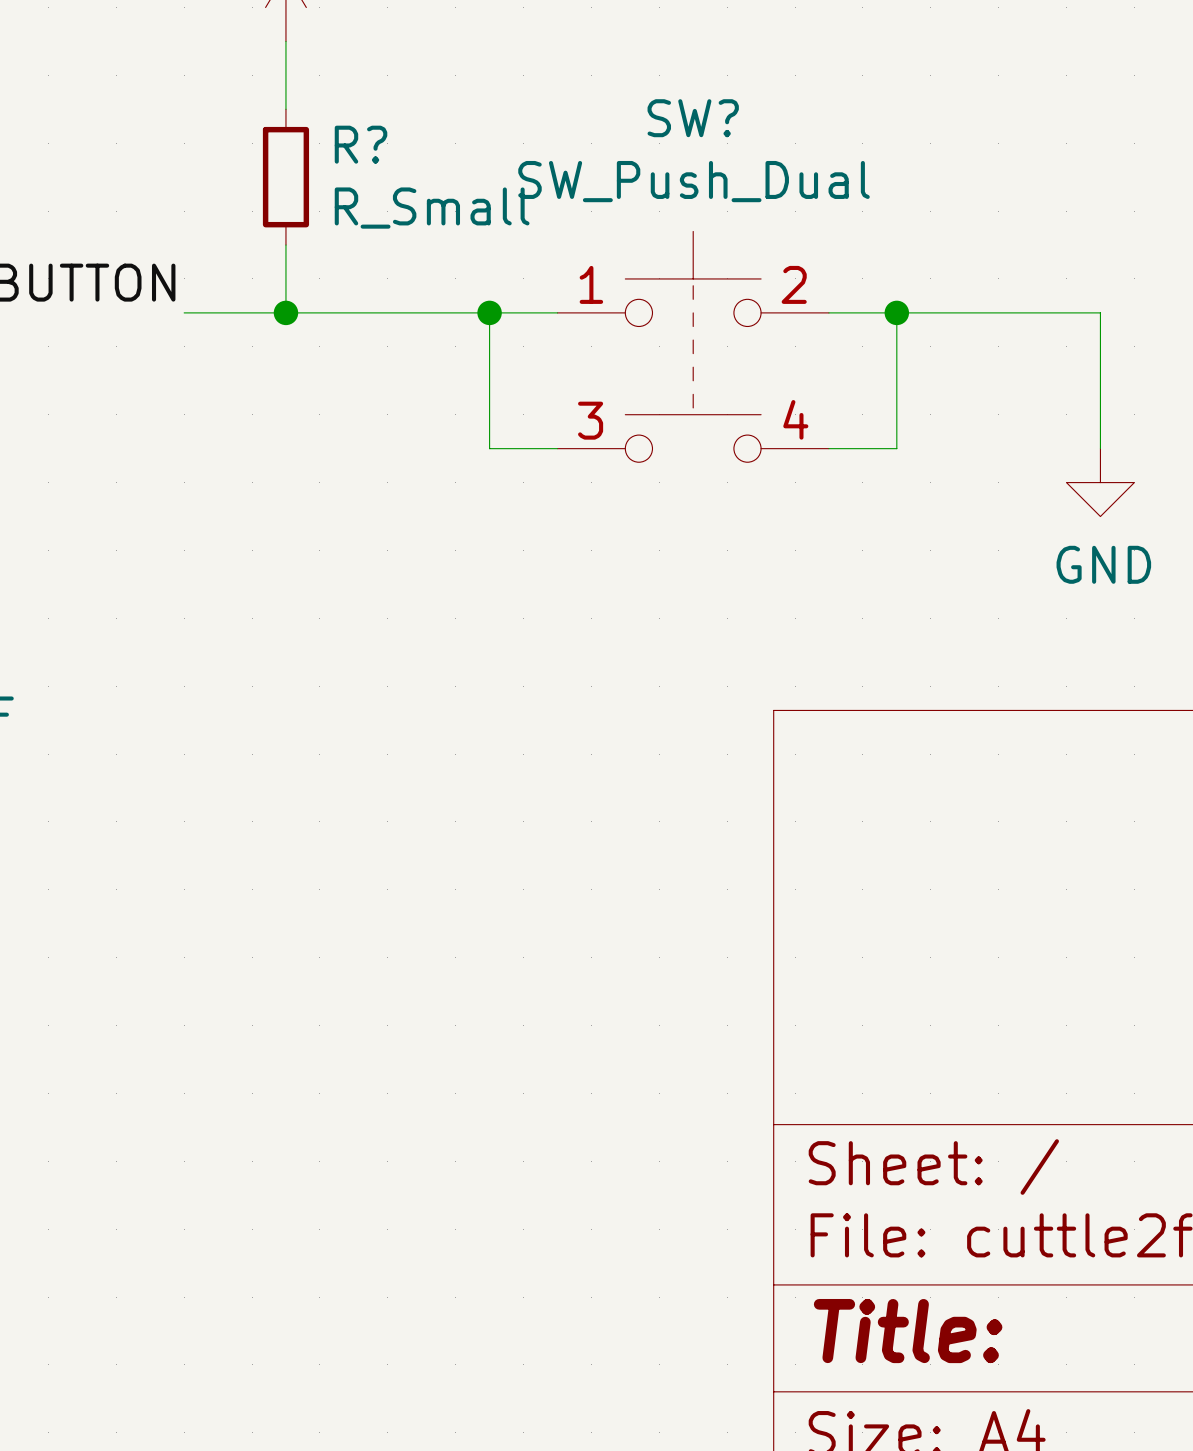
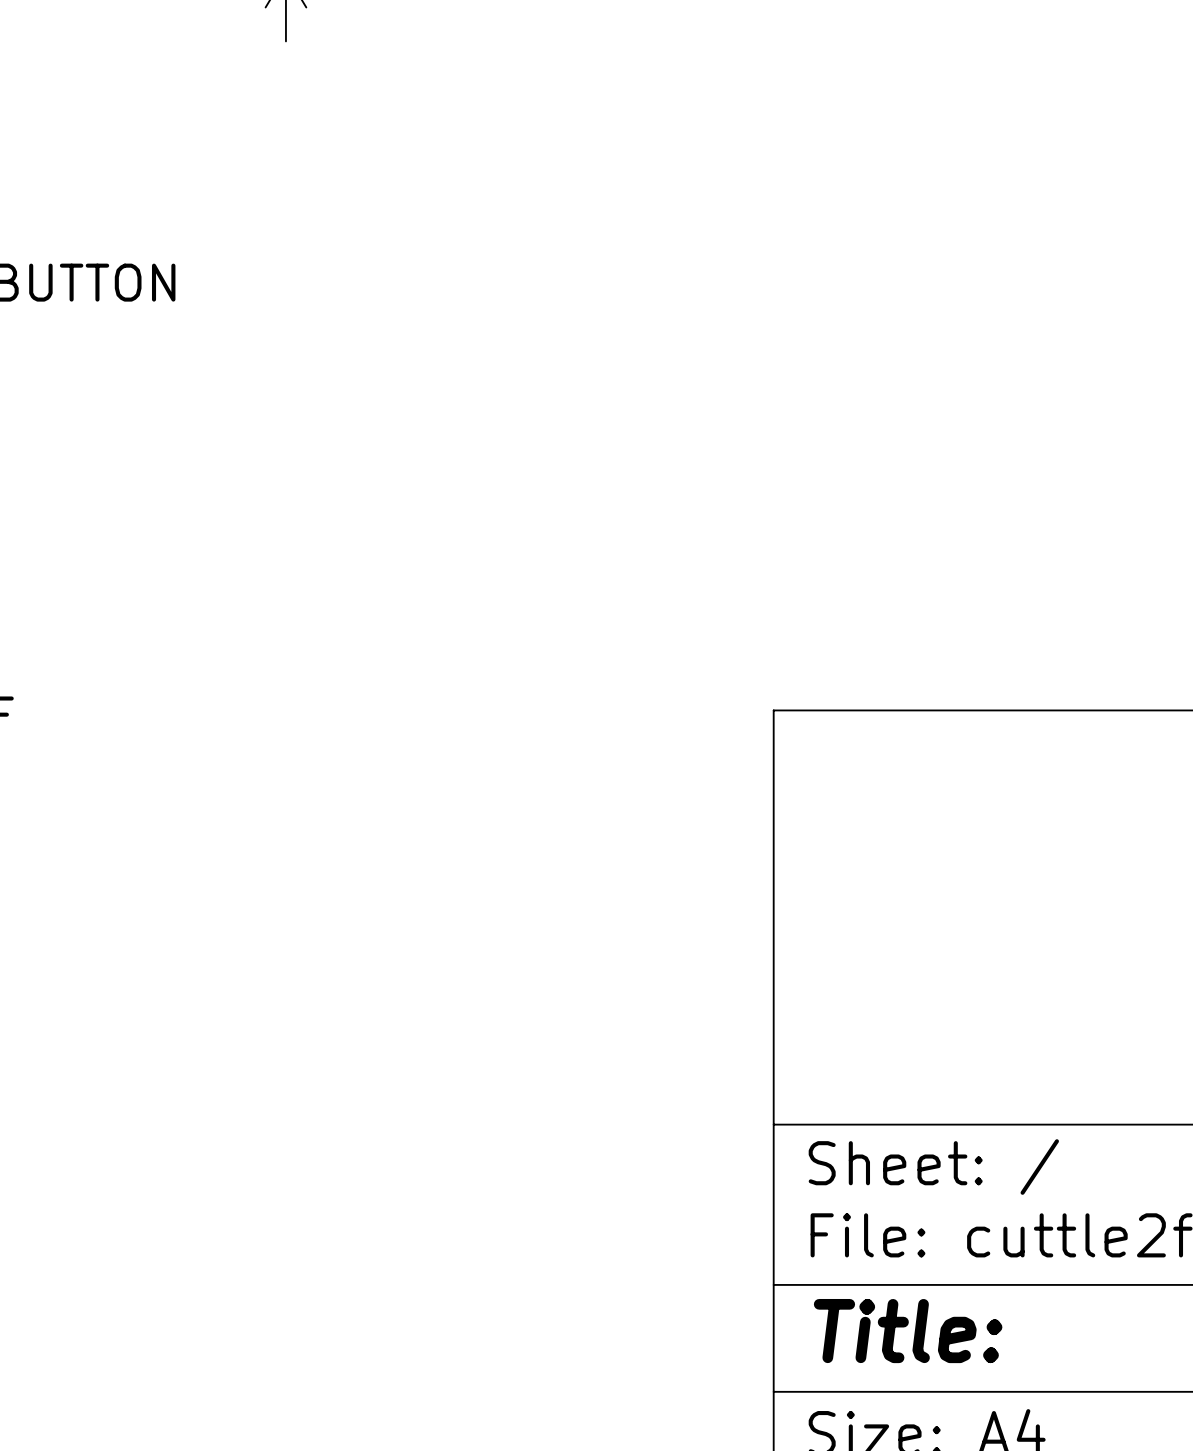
wire: (285, 41) (285, 109) -> none
R?: R_Small (285, 177) -> none
wire: (285, 245) (285, 312) -> none
wire: (184, 312) (557, 312) -> none
junction: (285, 312) -> none
wire: (489, 312) (489, 448) (557, 448) -> none
junction: (489, 312) -> none
wire: (828, 312) (1100, 312) (1100, 448) -> none
wire: (896, 312) (896, 448) (828, 448) -> none
junction: (896, 312) -> none
SW?: SW_Push_Dual (693, 346) -> none
power symbol: GND (1100, 482) -> none

